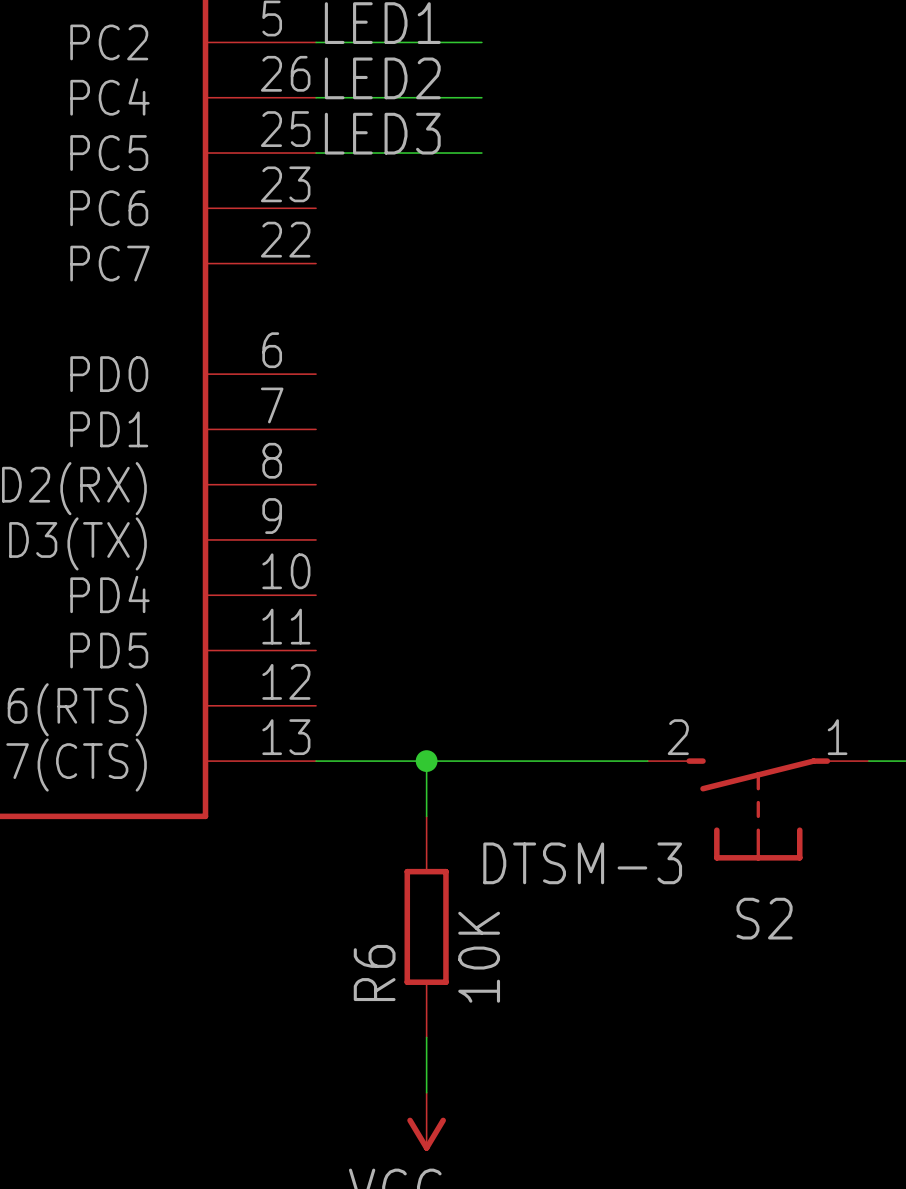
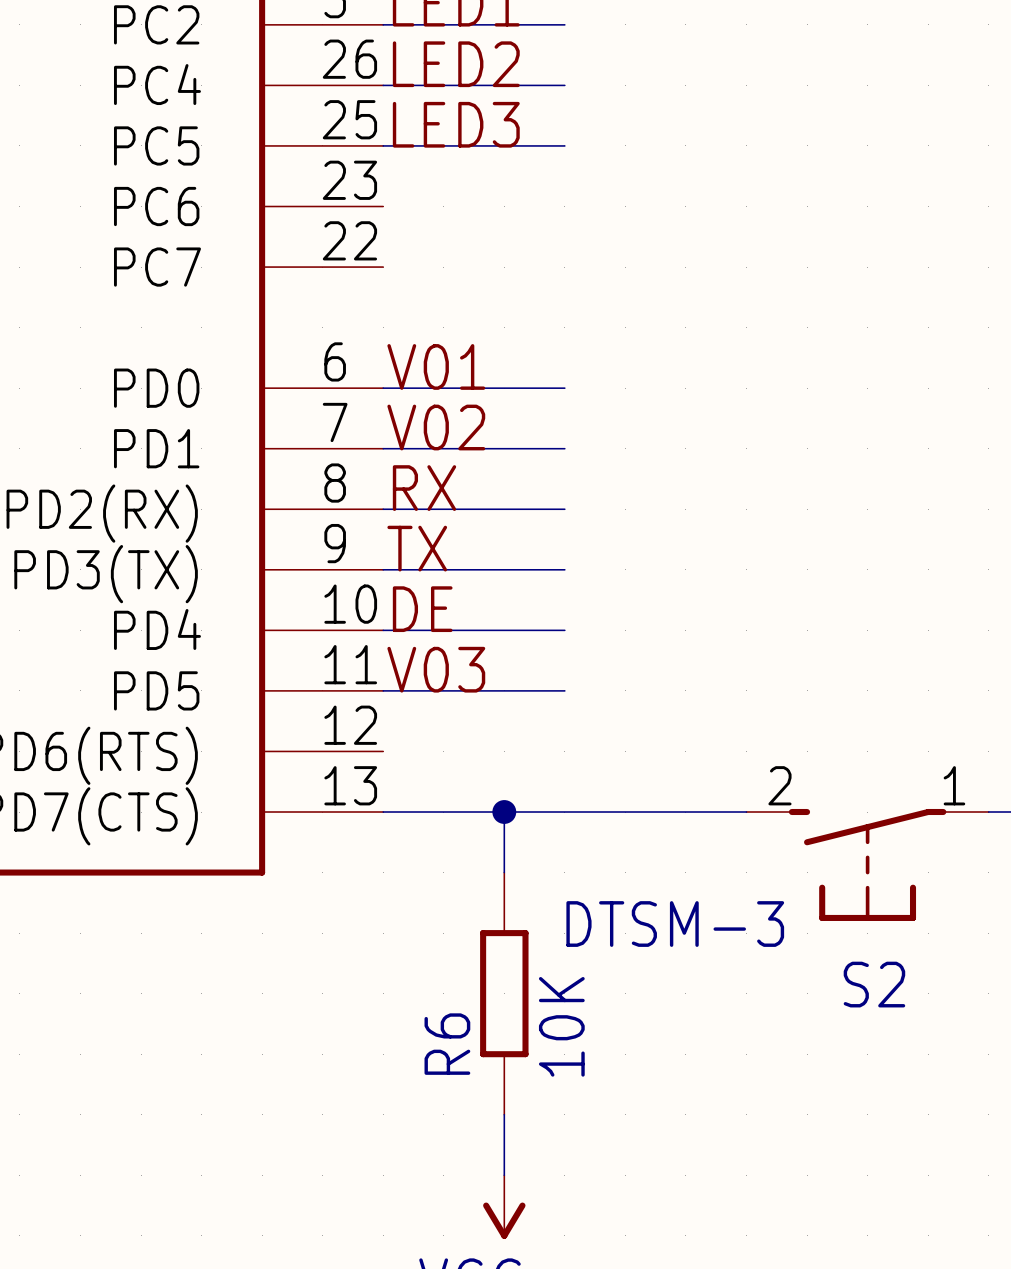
label: none -> V01 (436, 366)
wire: none -> (383, 388) (564, 388)
label: none -> V02 (436, 427)
wire: none -> (383, 448) (564, 448)
label: none -> RX (424, 488)
wire: none -> (383, 509) (564, 509)
label: none -> TX (417, 548)
wire: none -> (383, 569) (564, 569)
label: none -> DE (422, 609)
wire: none -> (383, 630) (564, 630)
label: none -> V03 (436, 669)
wire: none -> (383, 690) (564, 690)

